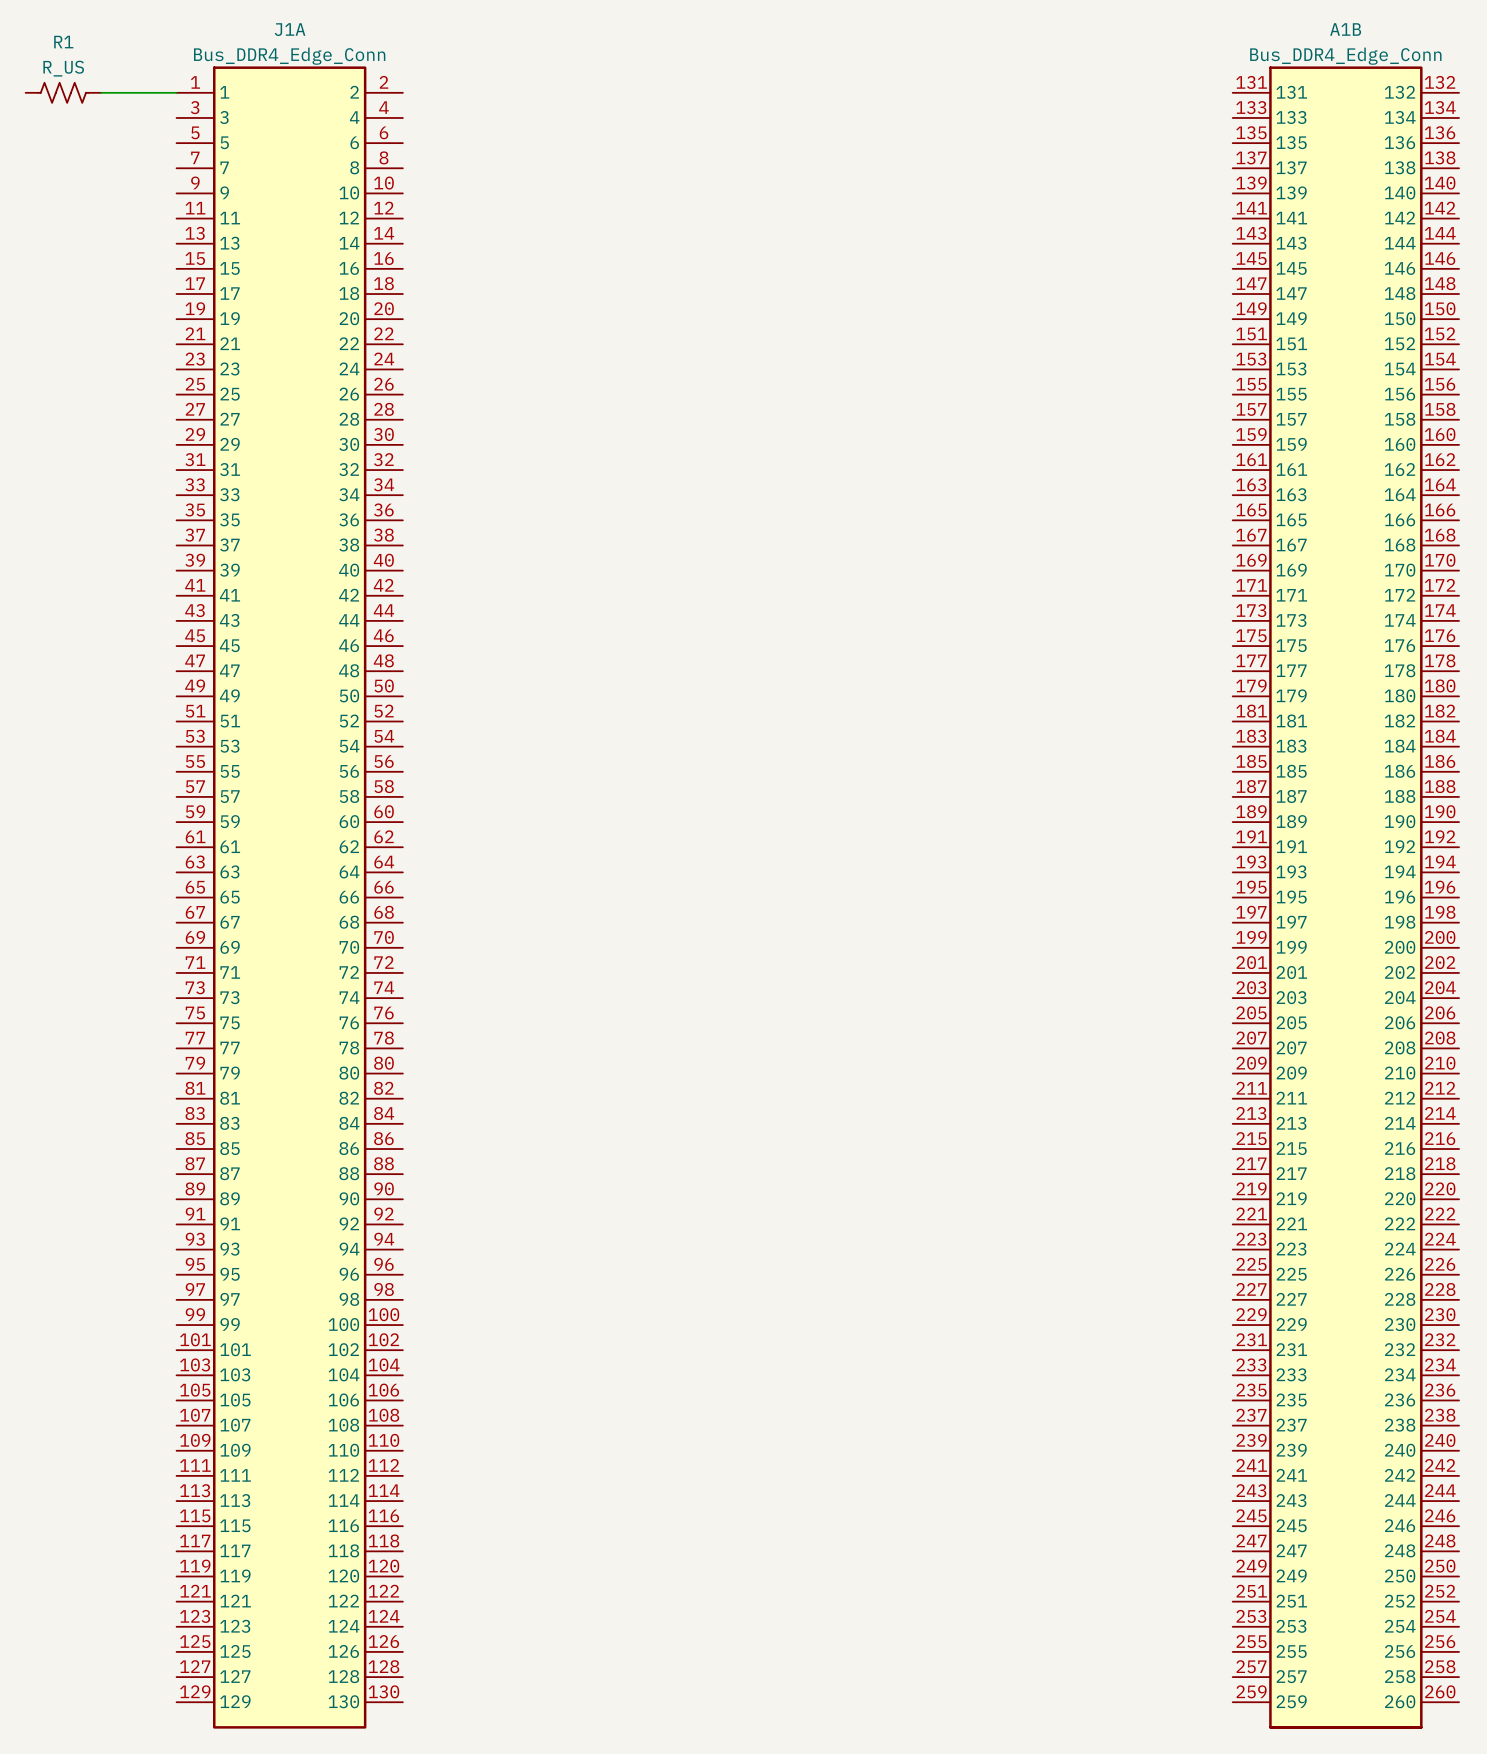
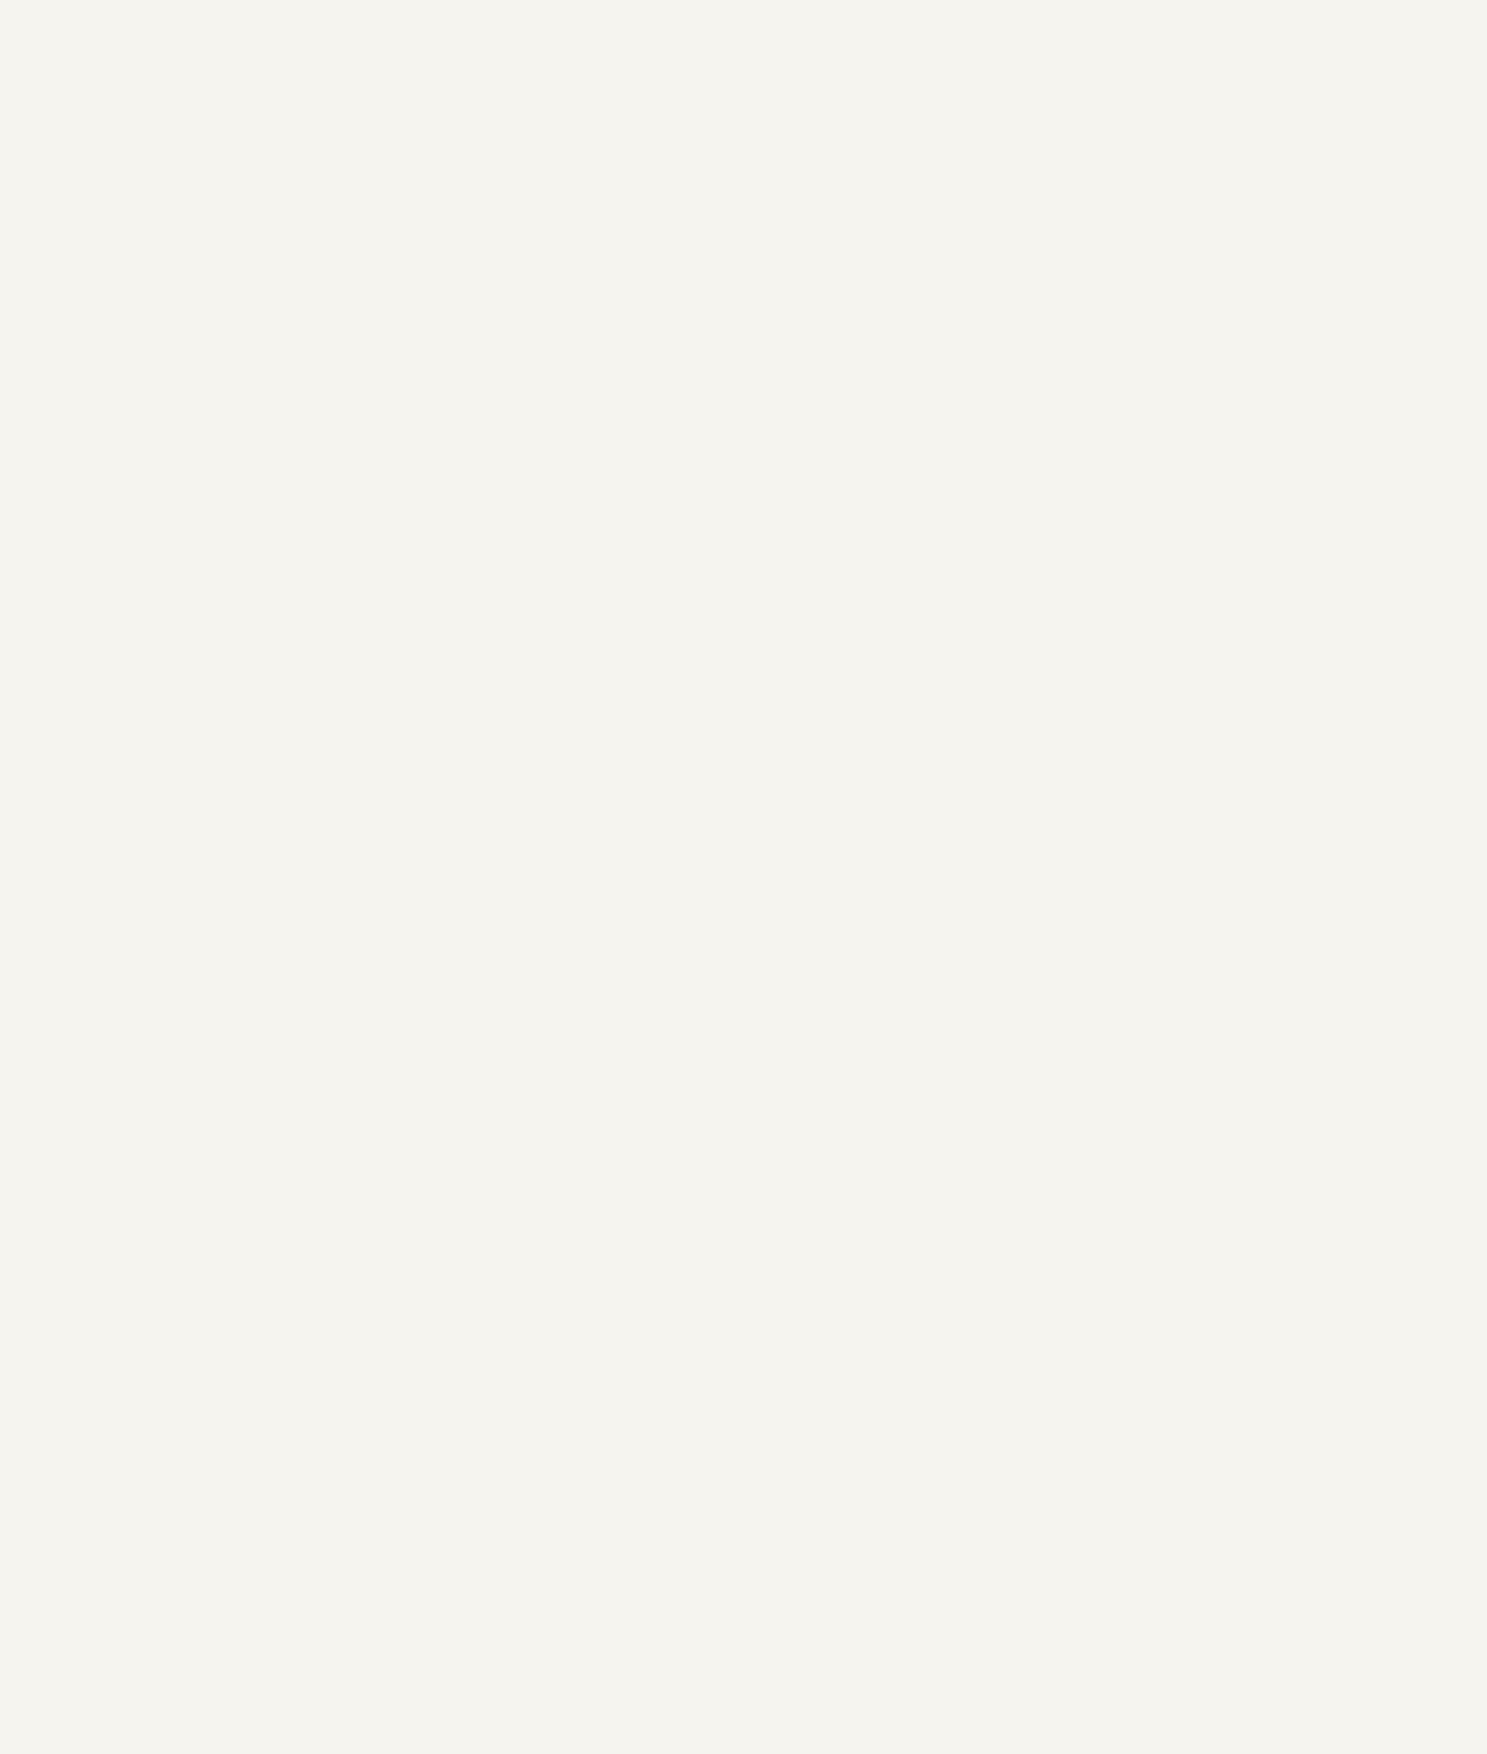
R1: R_US (63, 92) -> none
wire: (101, 92) (176, 92) -> none
J1A: Bus_DDR4_Edge_Conn (289, 897) -> none
A1B: Bus_DDR4_Edge_Conn (1345, 897) -> none

